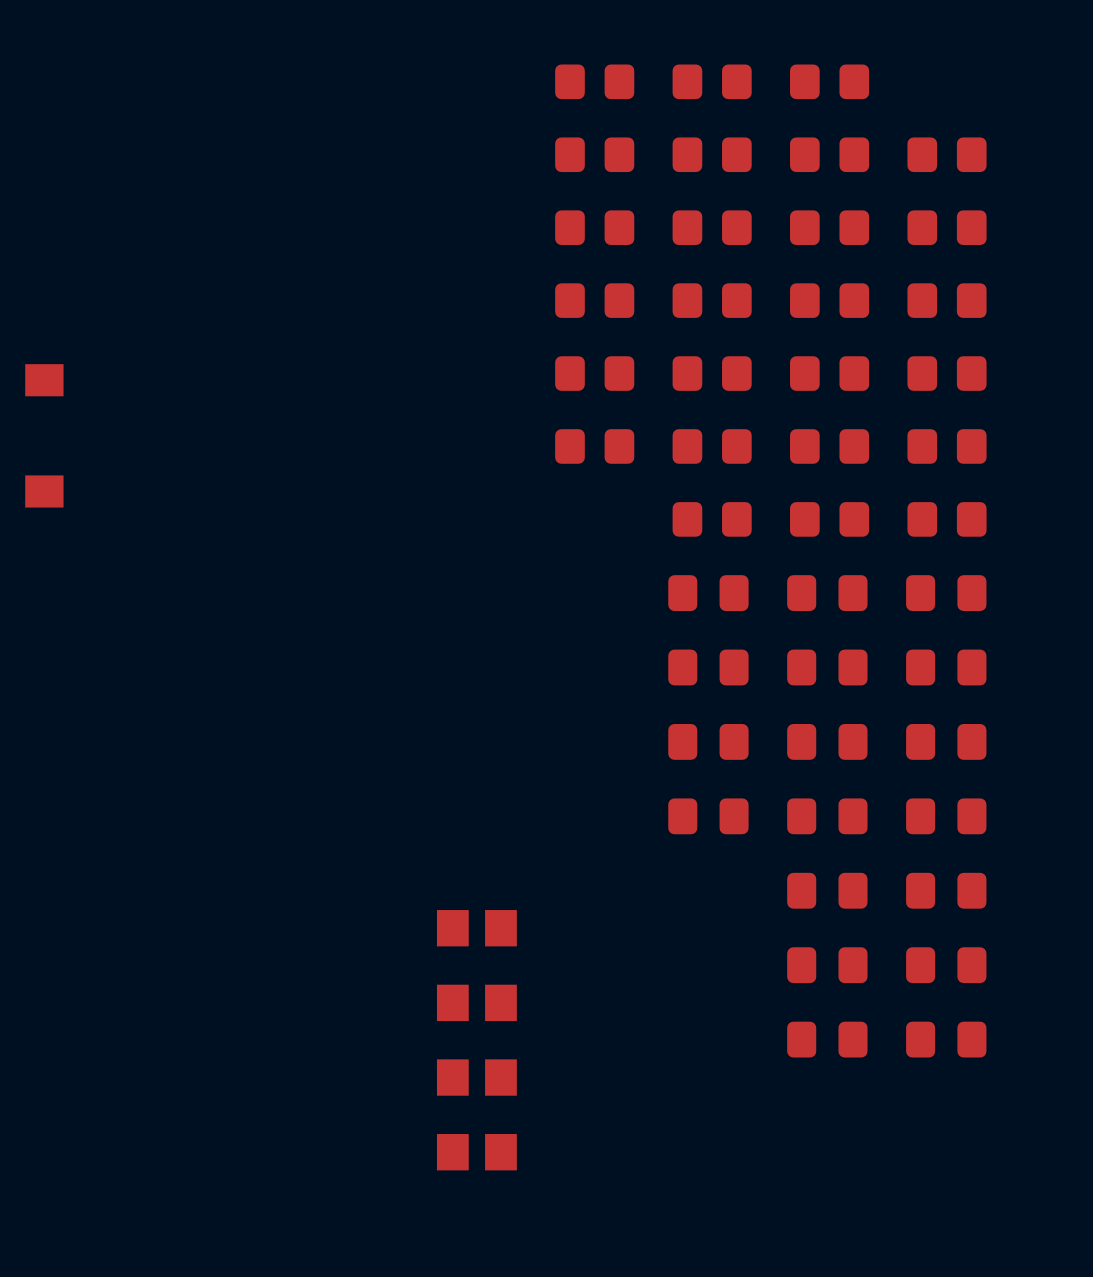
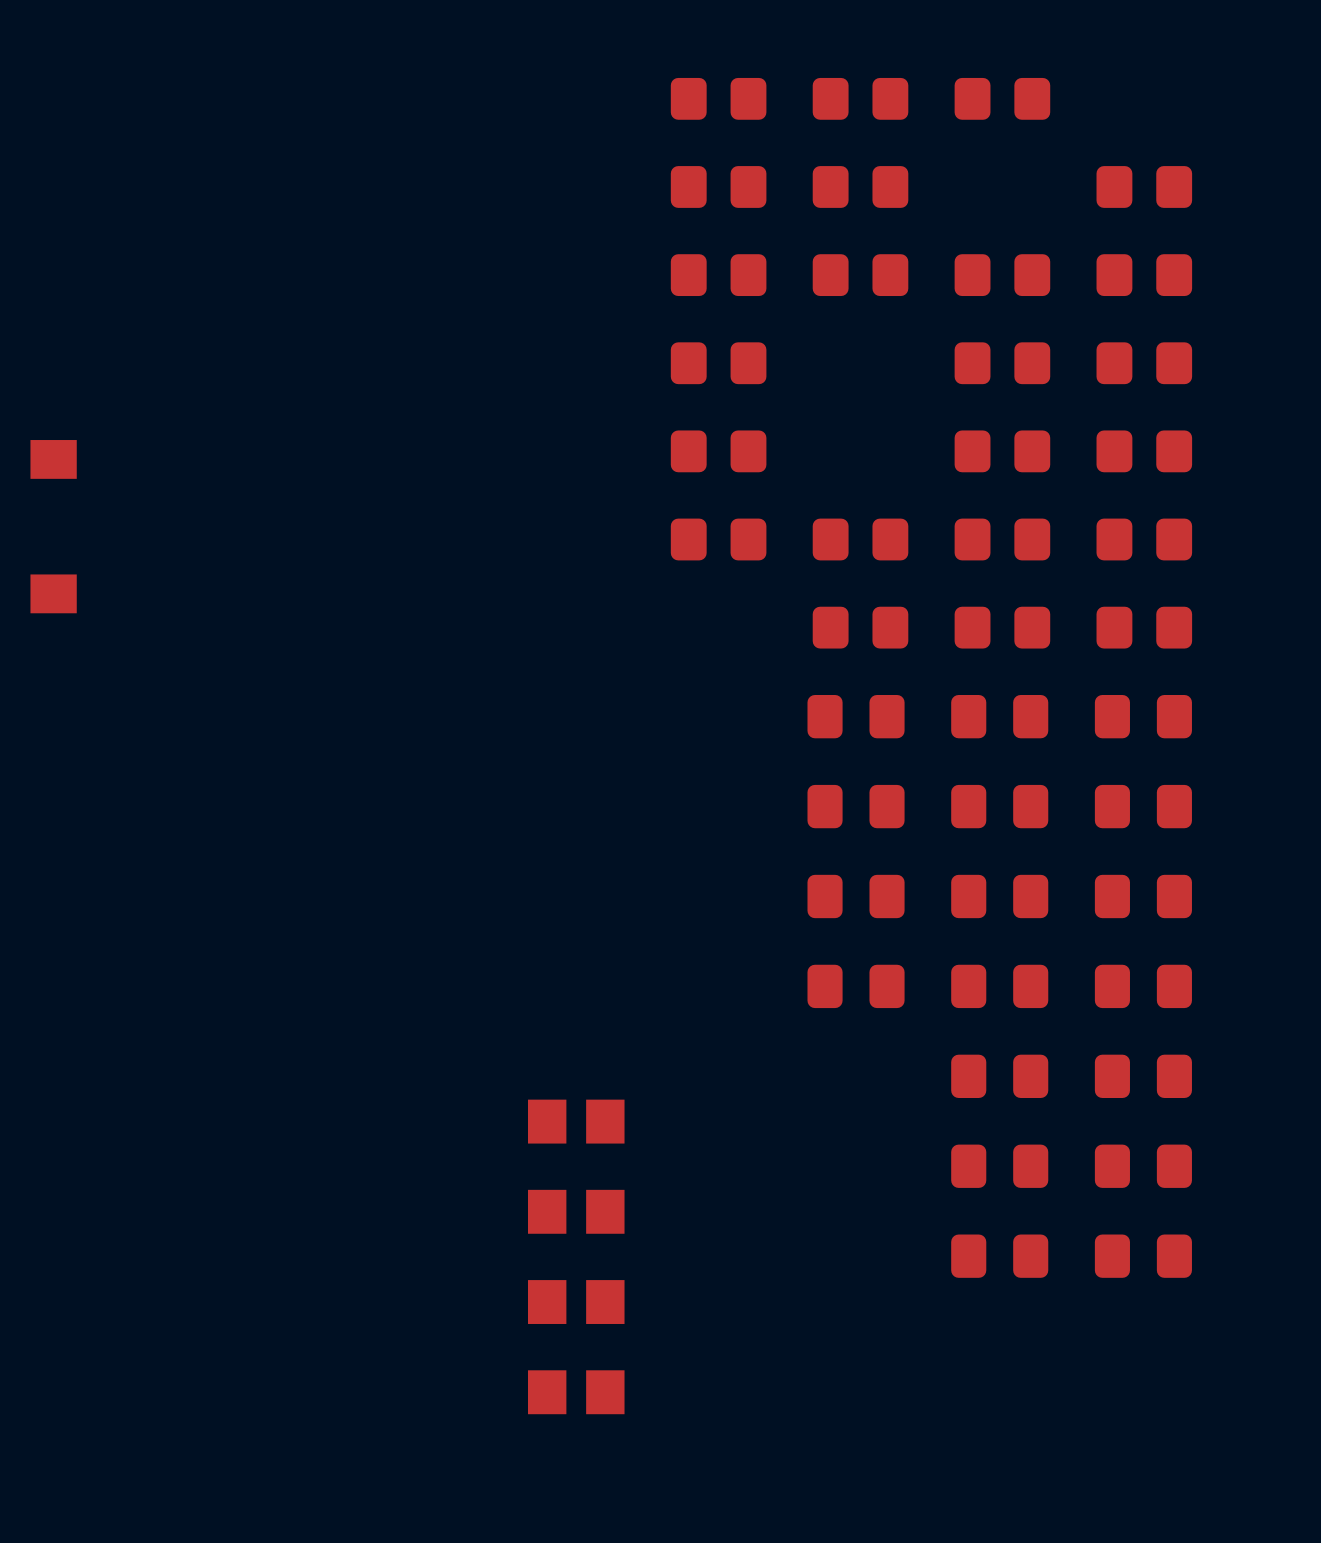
part: (829, 154) -> none
part: (712, 300) -> none
part: (712, 373) -> none

